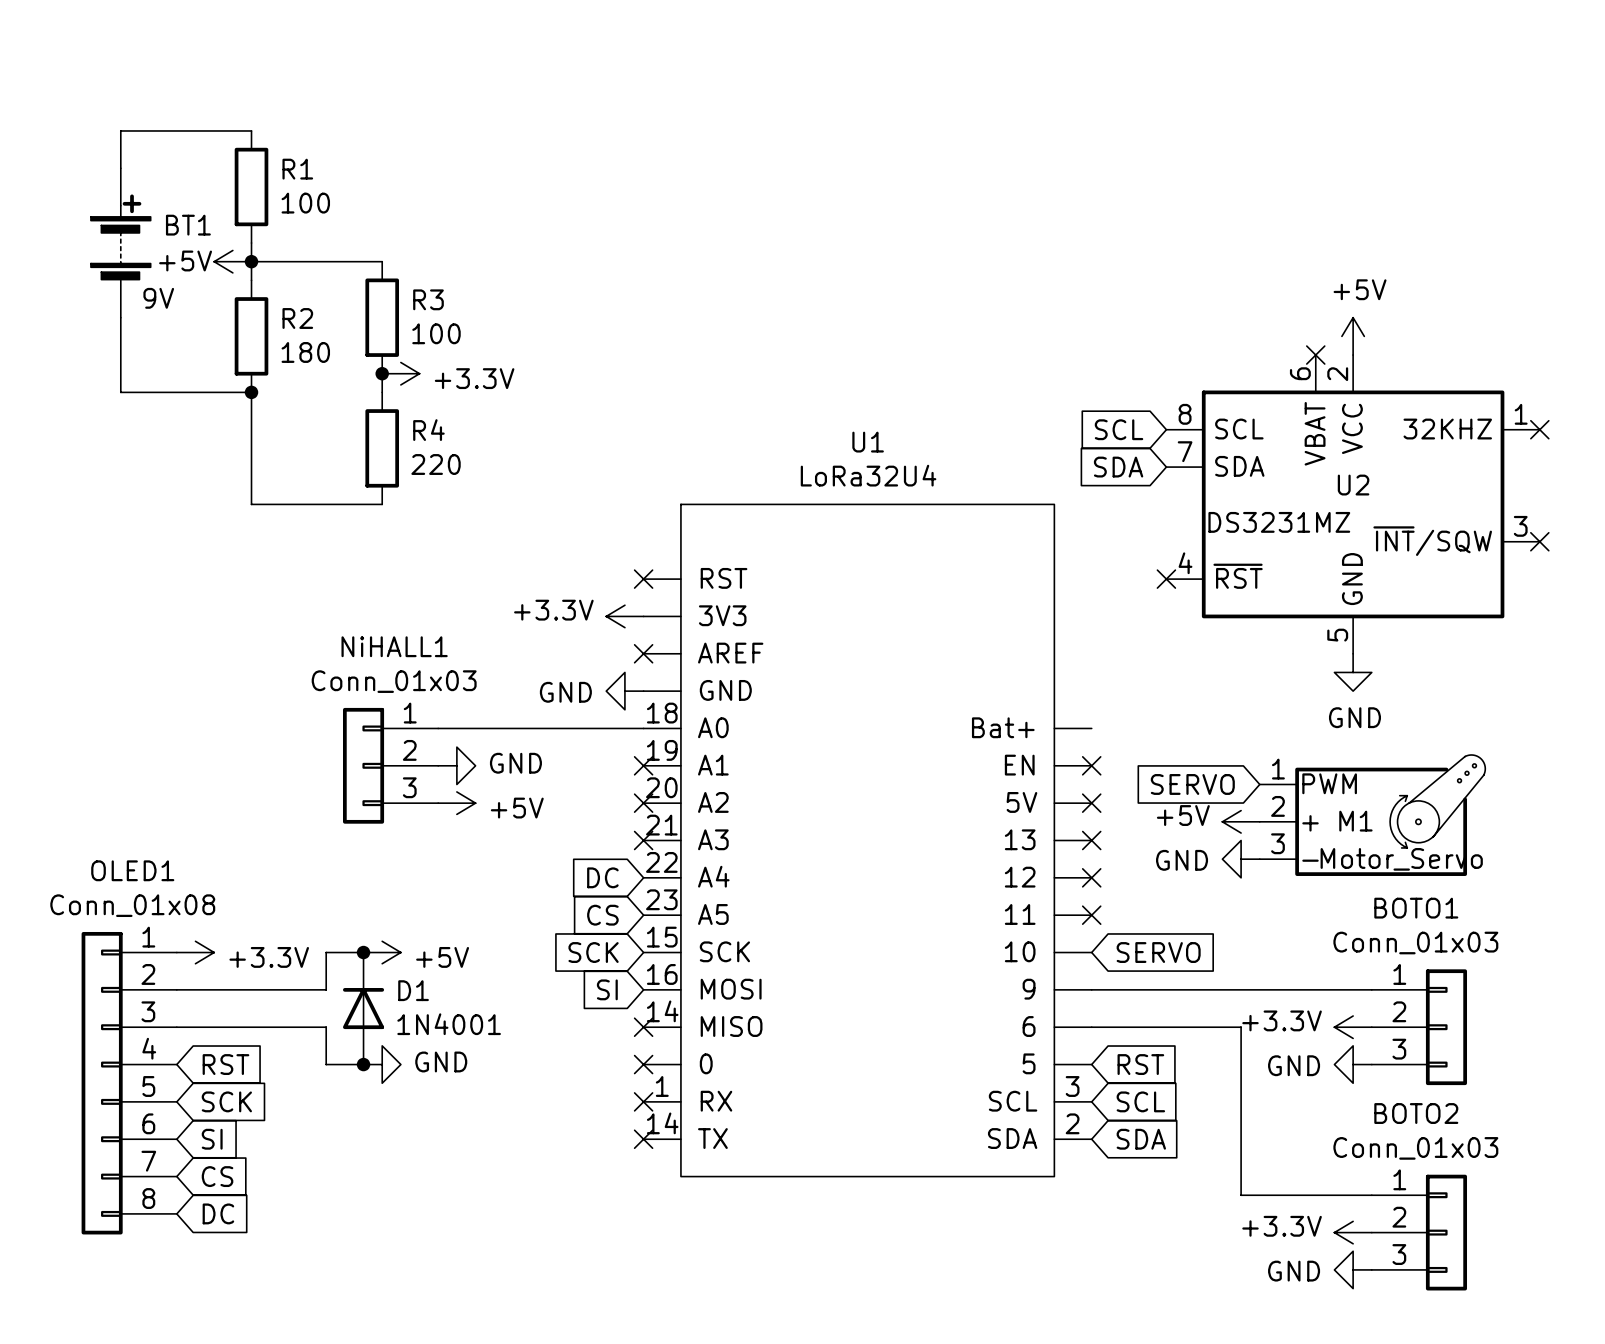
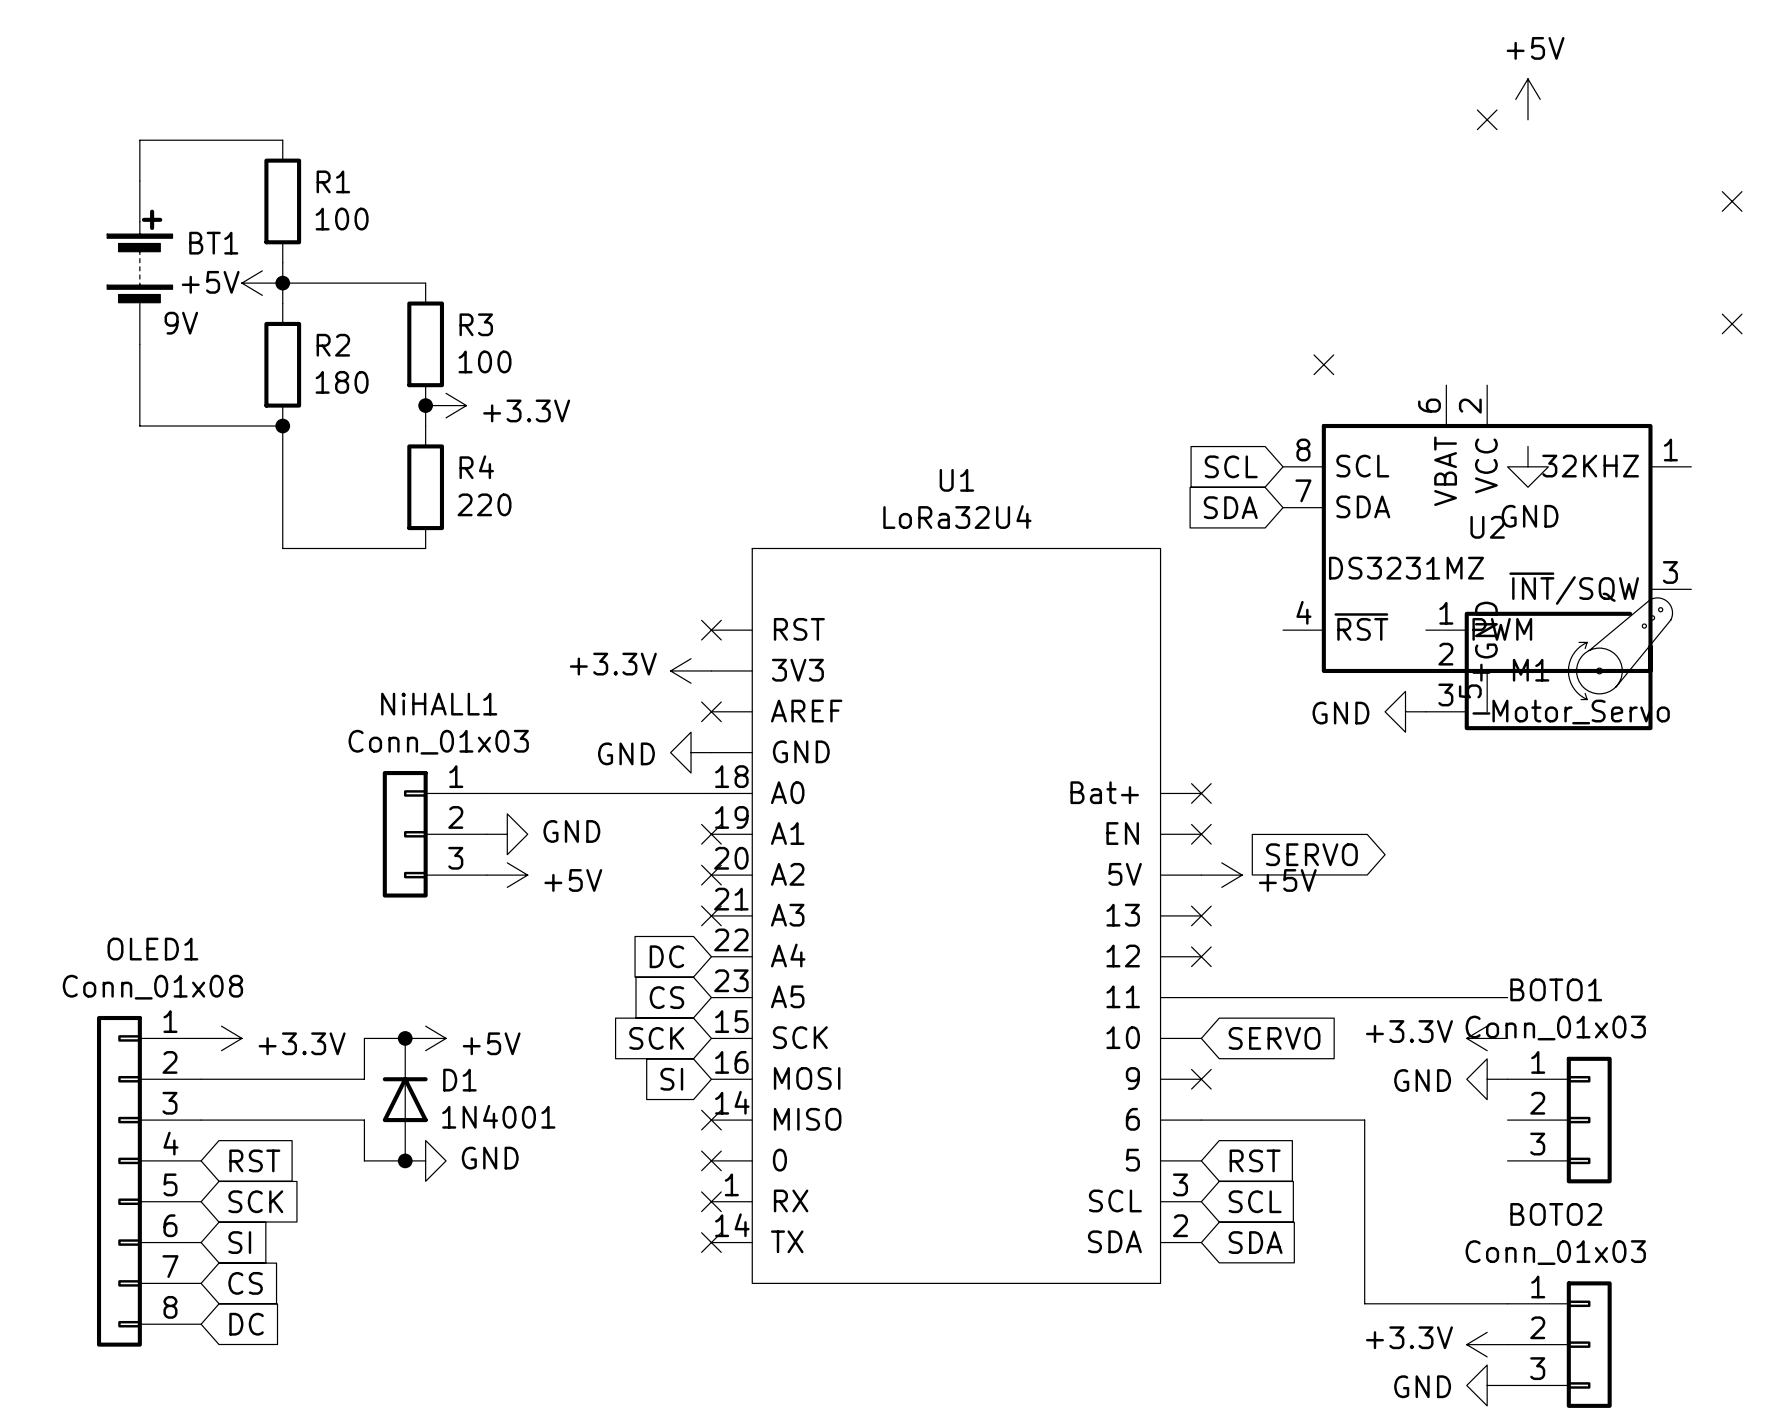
no-connect mark: none -> (1487, 119)
no-connect mark: none -> (1732, 201)
no-connect mark: none -> (1732, 323)
no-connect mark: none -> (1323, 364)
power symbol position: +5V (1353, 336) -> +5V (1527, 99)
no-connect mark: (1315, 355) -> none
power symbol: none -> GND (1527, 466)
no-connect mark: (1539, 429) -> none
no-connect mark: (1539, 541) -> none
no-connect mark: (1166, 579) -> none
power symbol rotation: 0° (1353, 672) -> 90° clockwise (1405, 711)
power symbol position: GND (1353, 672) -> GND (1405, 711)
no-connect mark position: (1091, 803) -> (1201, 793)
M1 position: (1372, 815) -> (1549, 664)
power symbol rotation: 0° (1241, 821) -> 180° (1221, 875)
power symbol position: +5V (1241, 821) -> +5V (1221, 875)
power symbol: GND (1241, 859) -> none
no-connect mark position: (1091, 915) -> (1201, 1079)
wire: (1091, 989) (1371, 989) -> (1201, 997) (1507, 997)
power symbol position: +3.3V (1353, 1027) -> +3.3V (1487, 1038)
power symbol position: GND (1353, 1064) -> GND (1487, 1079)

